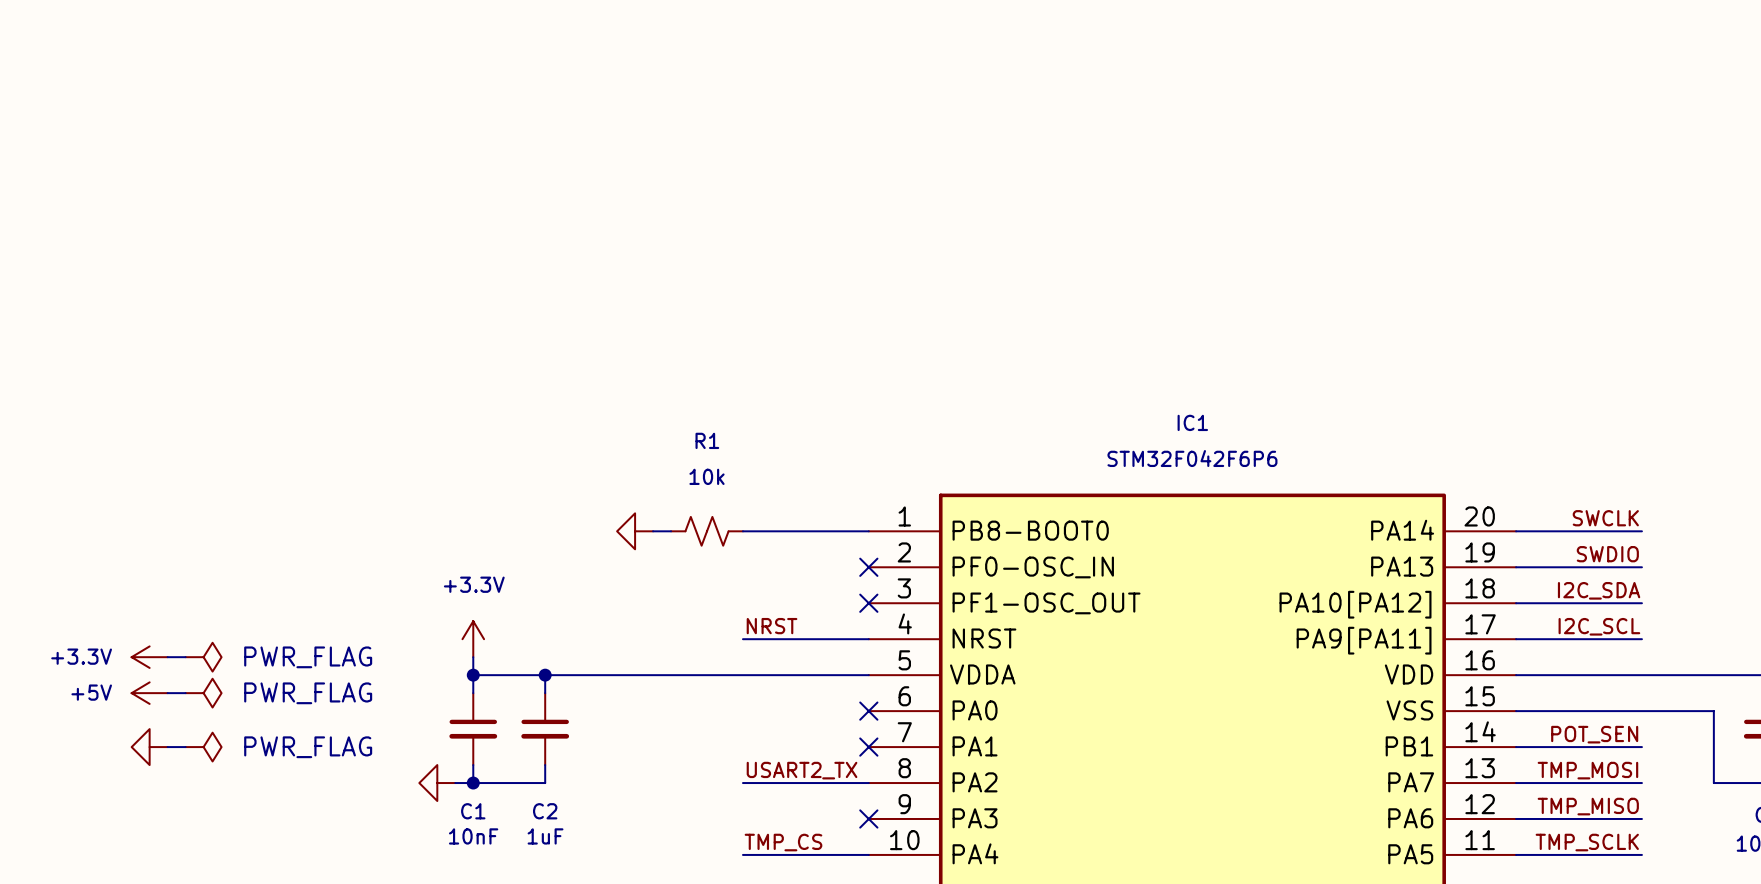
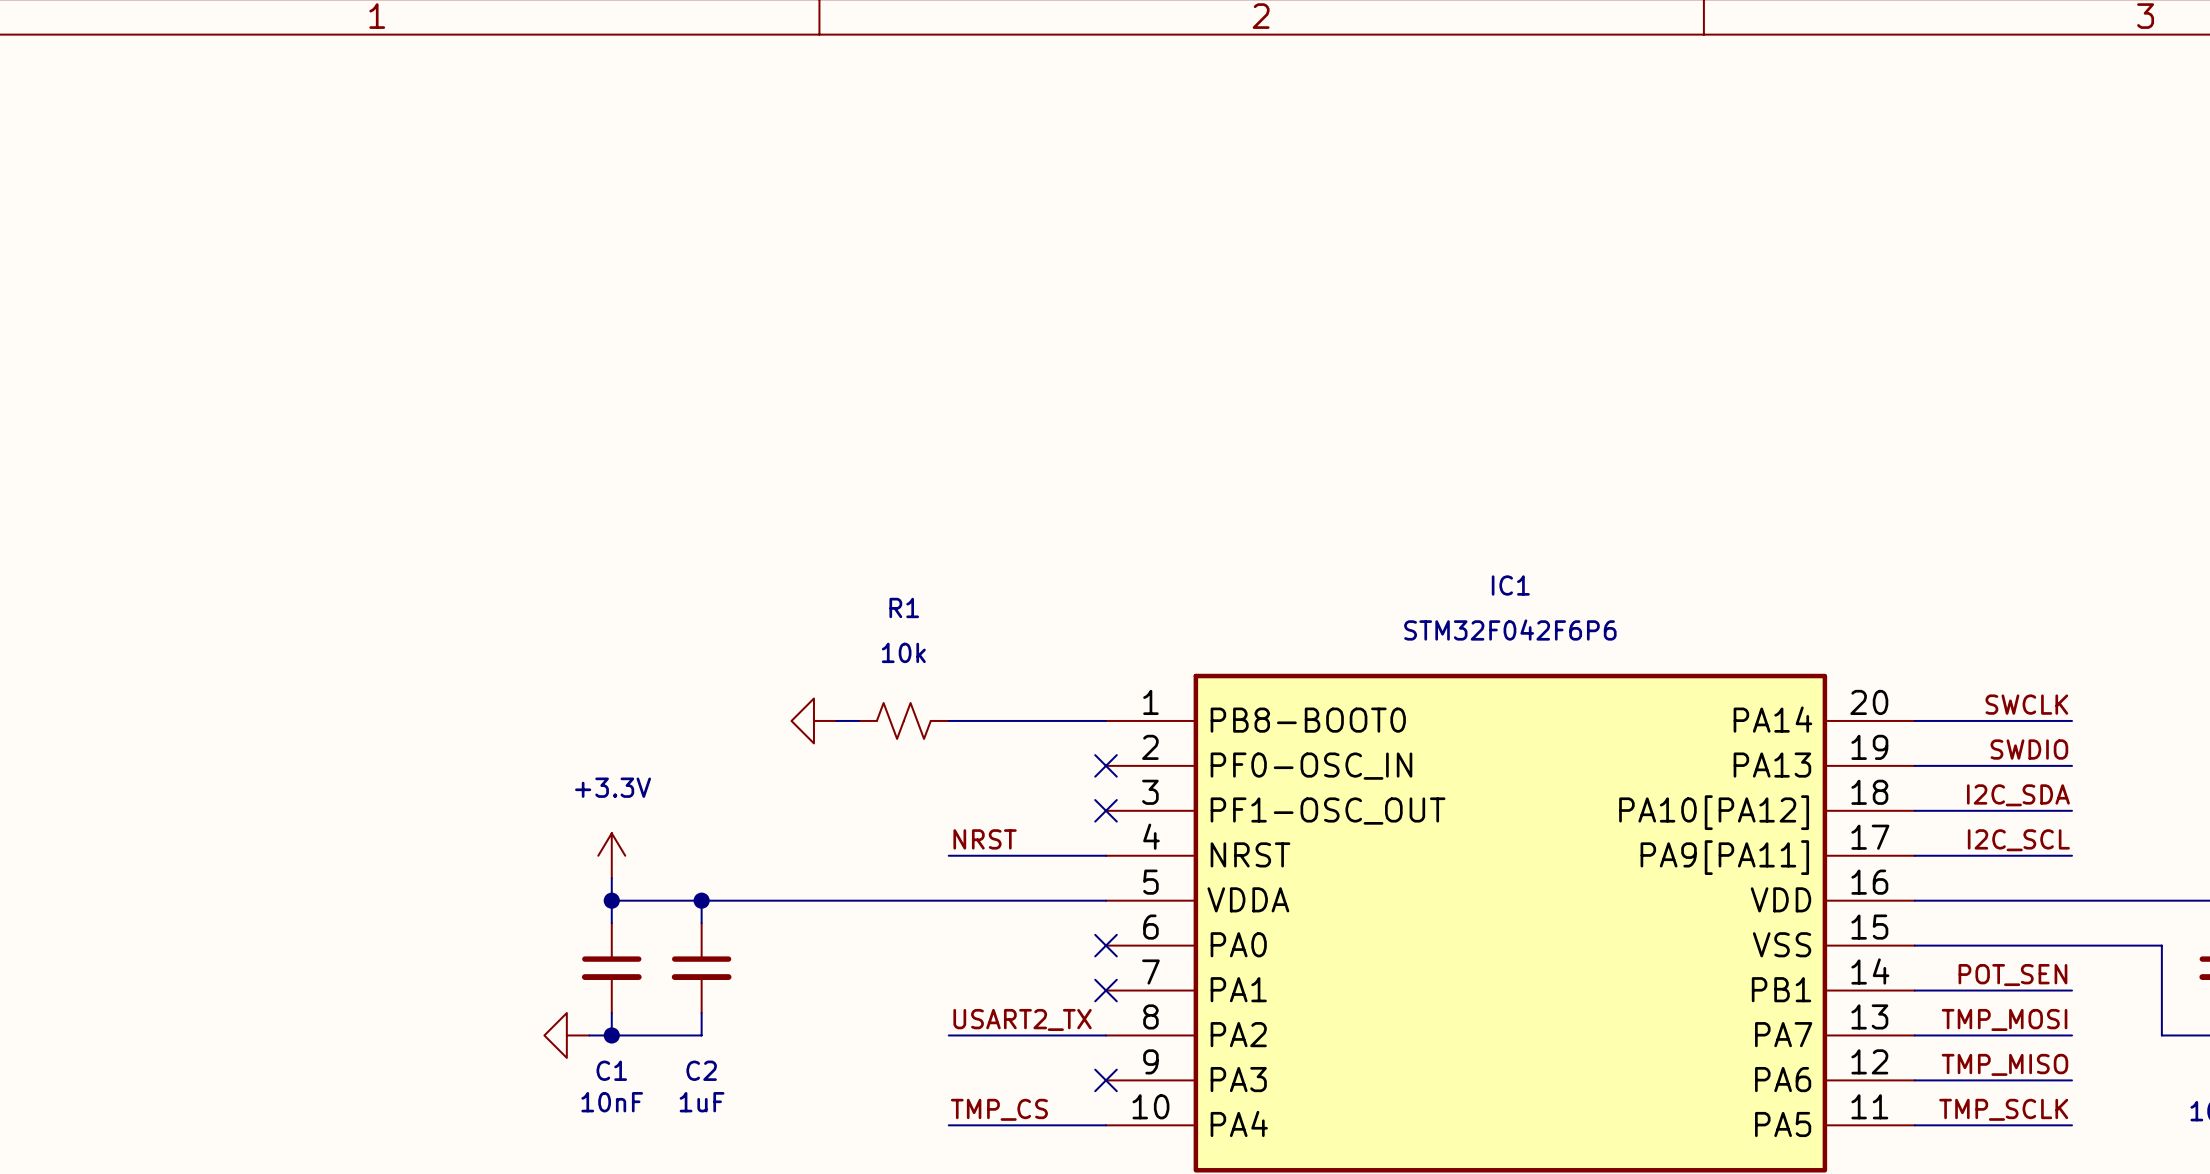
power symbol: +3.3V (149, 657) -> none
wire: (167, 657) (185, 657) -> none
power symbol: PWR_FLAG (203, 657) -> none
power symbol: +5V (149, 693) -> none
wire: (167, 693) (185, 693) -> none
power symbol: PWR_FLAG (203, 693) -> none
power symbol: (149, 747) -> none
wire: (167, 747) (185, 747) -> none
power symbol: PWR_FLAG (203, 747) -> none

